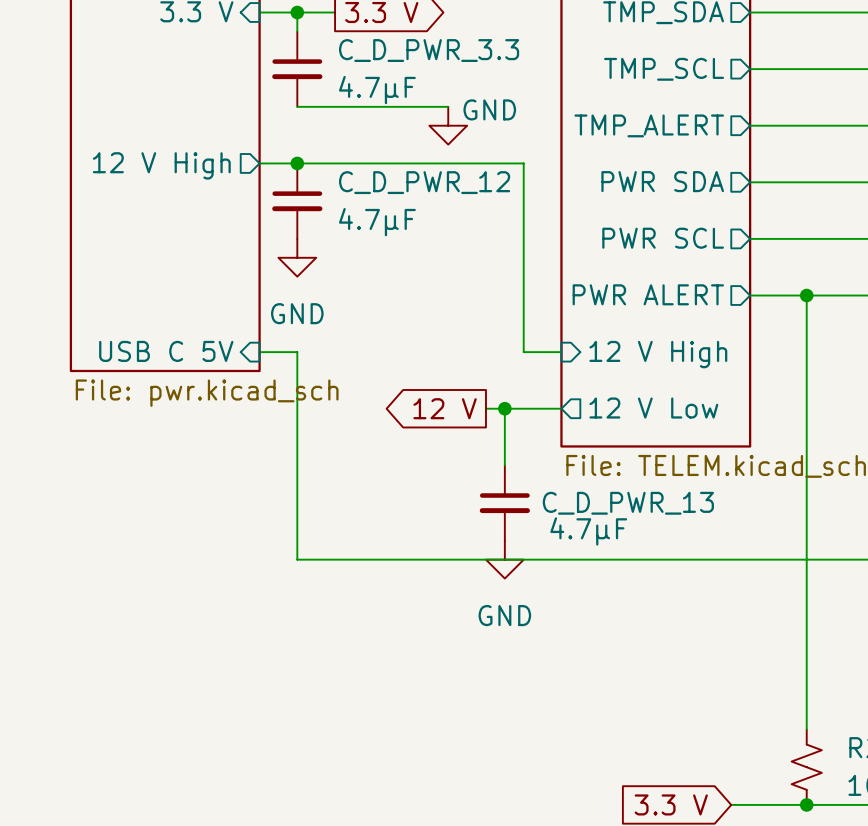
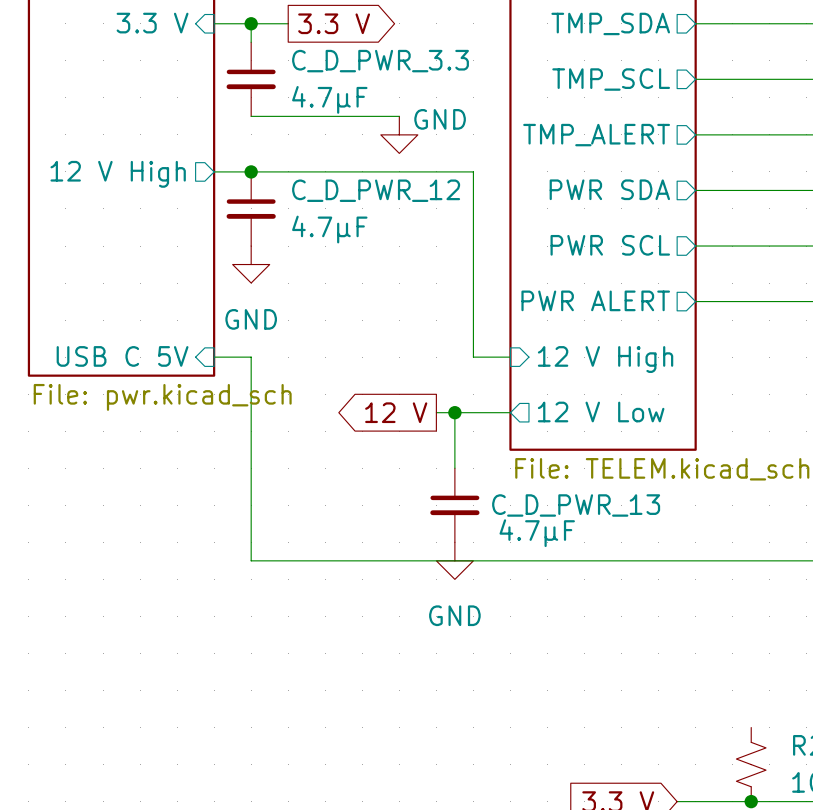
wire: (806, 295) (806, 729) -> none
junction: (806, 295) -> none

